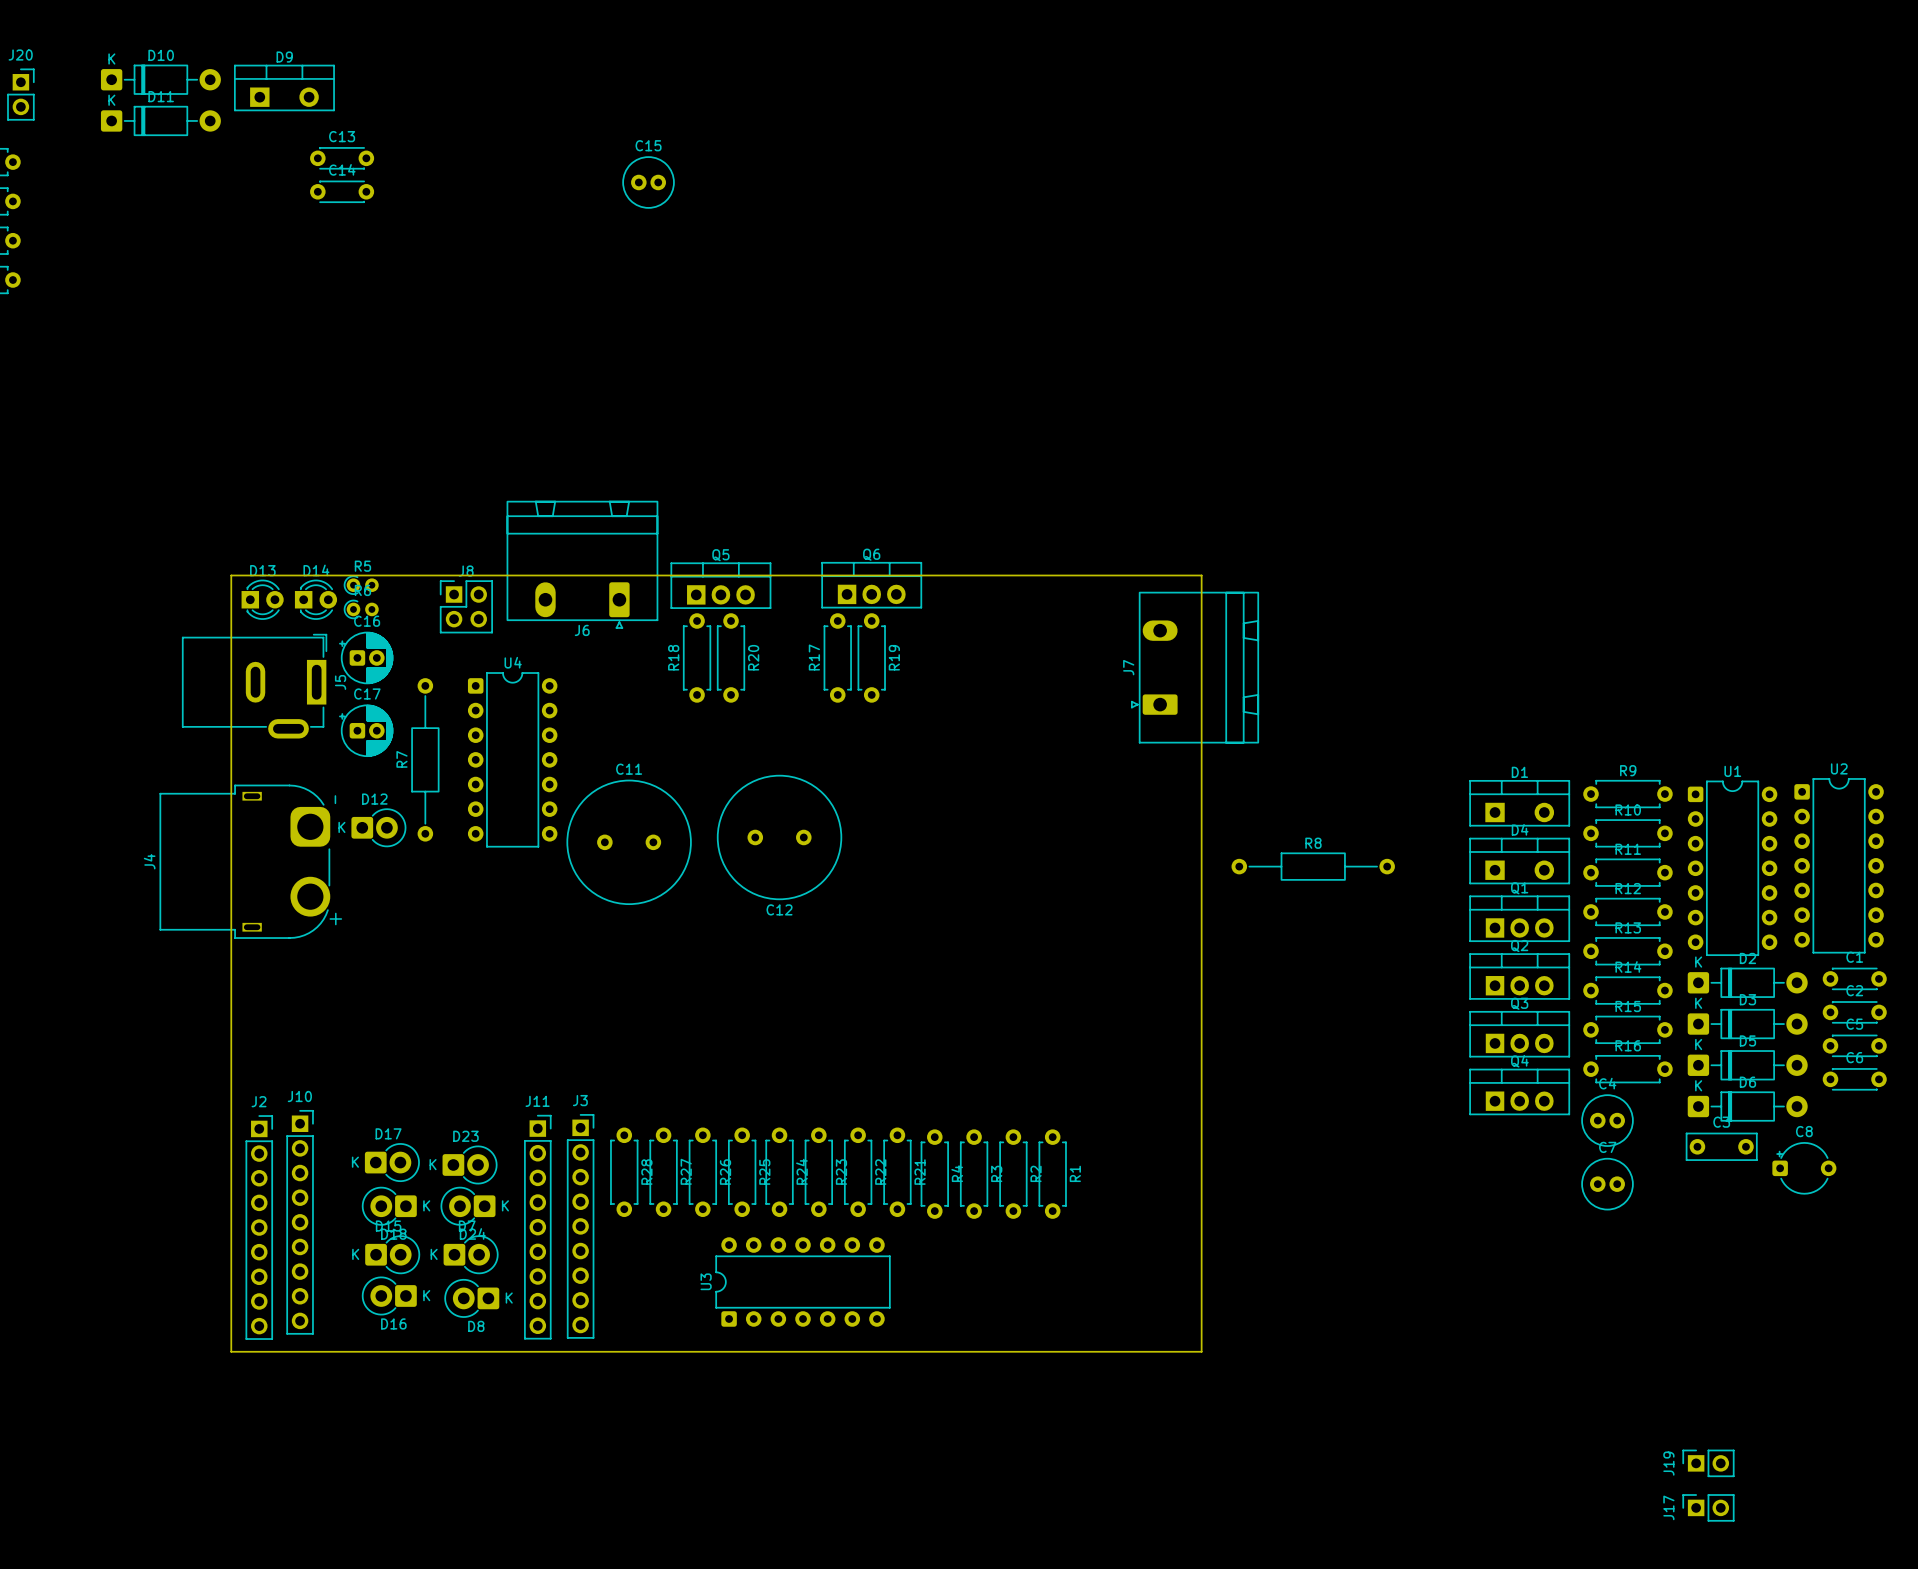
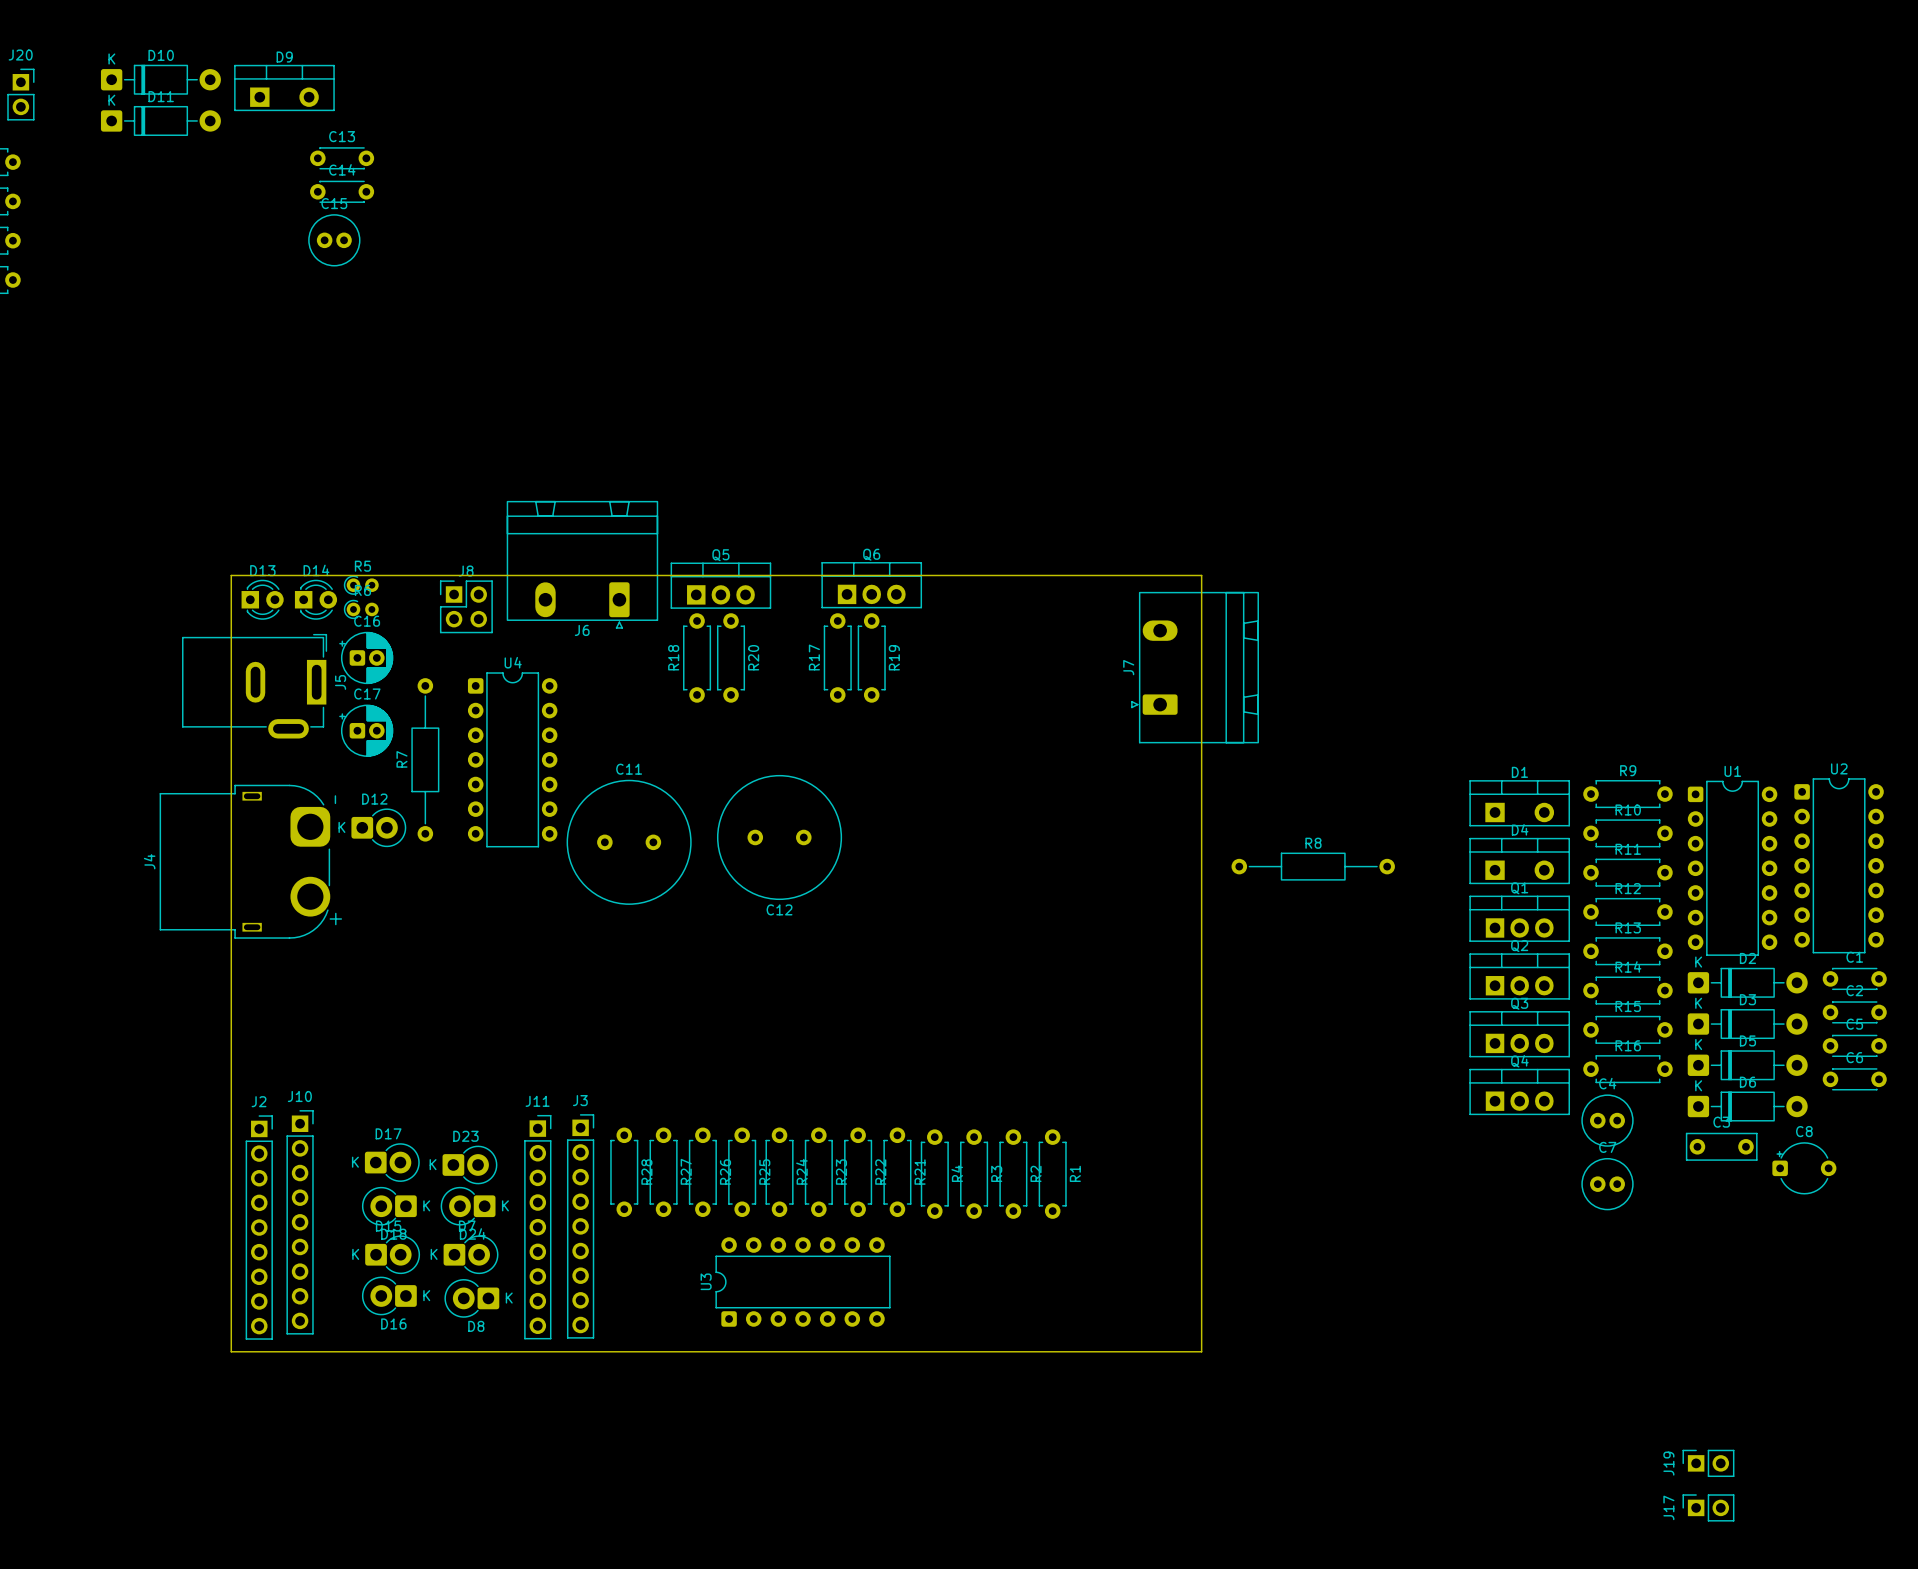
C15 position: (648, 182) -> (334, 240)

